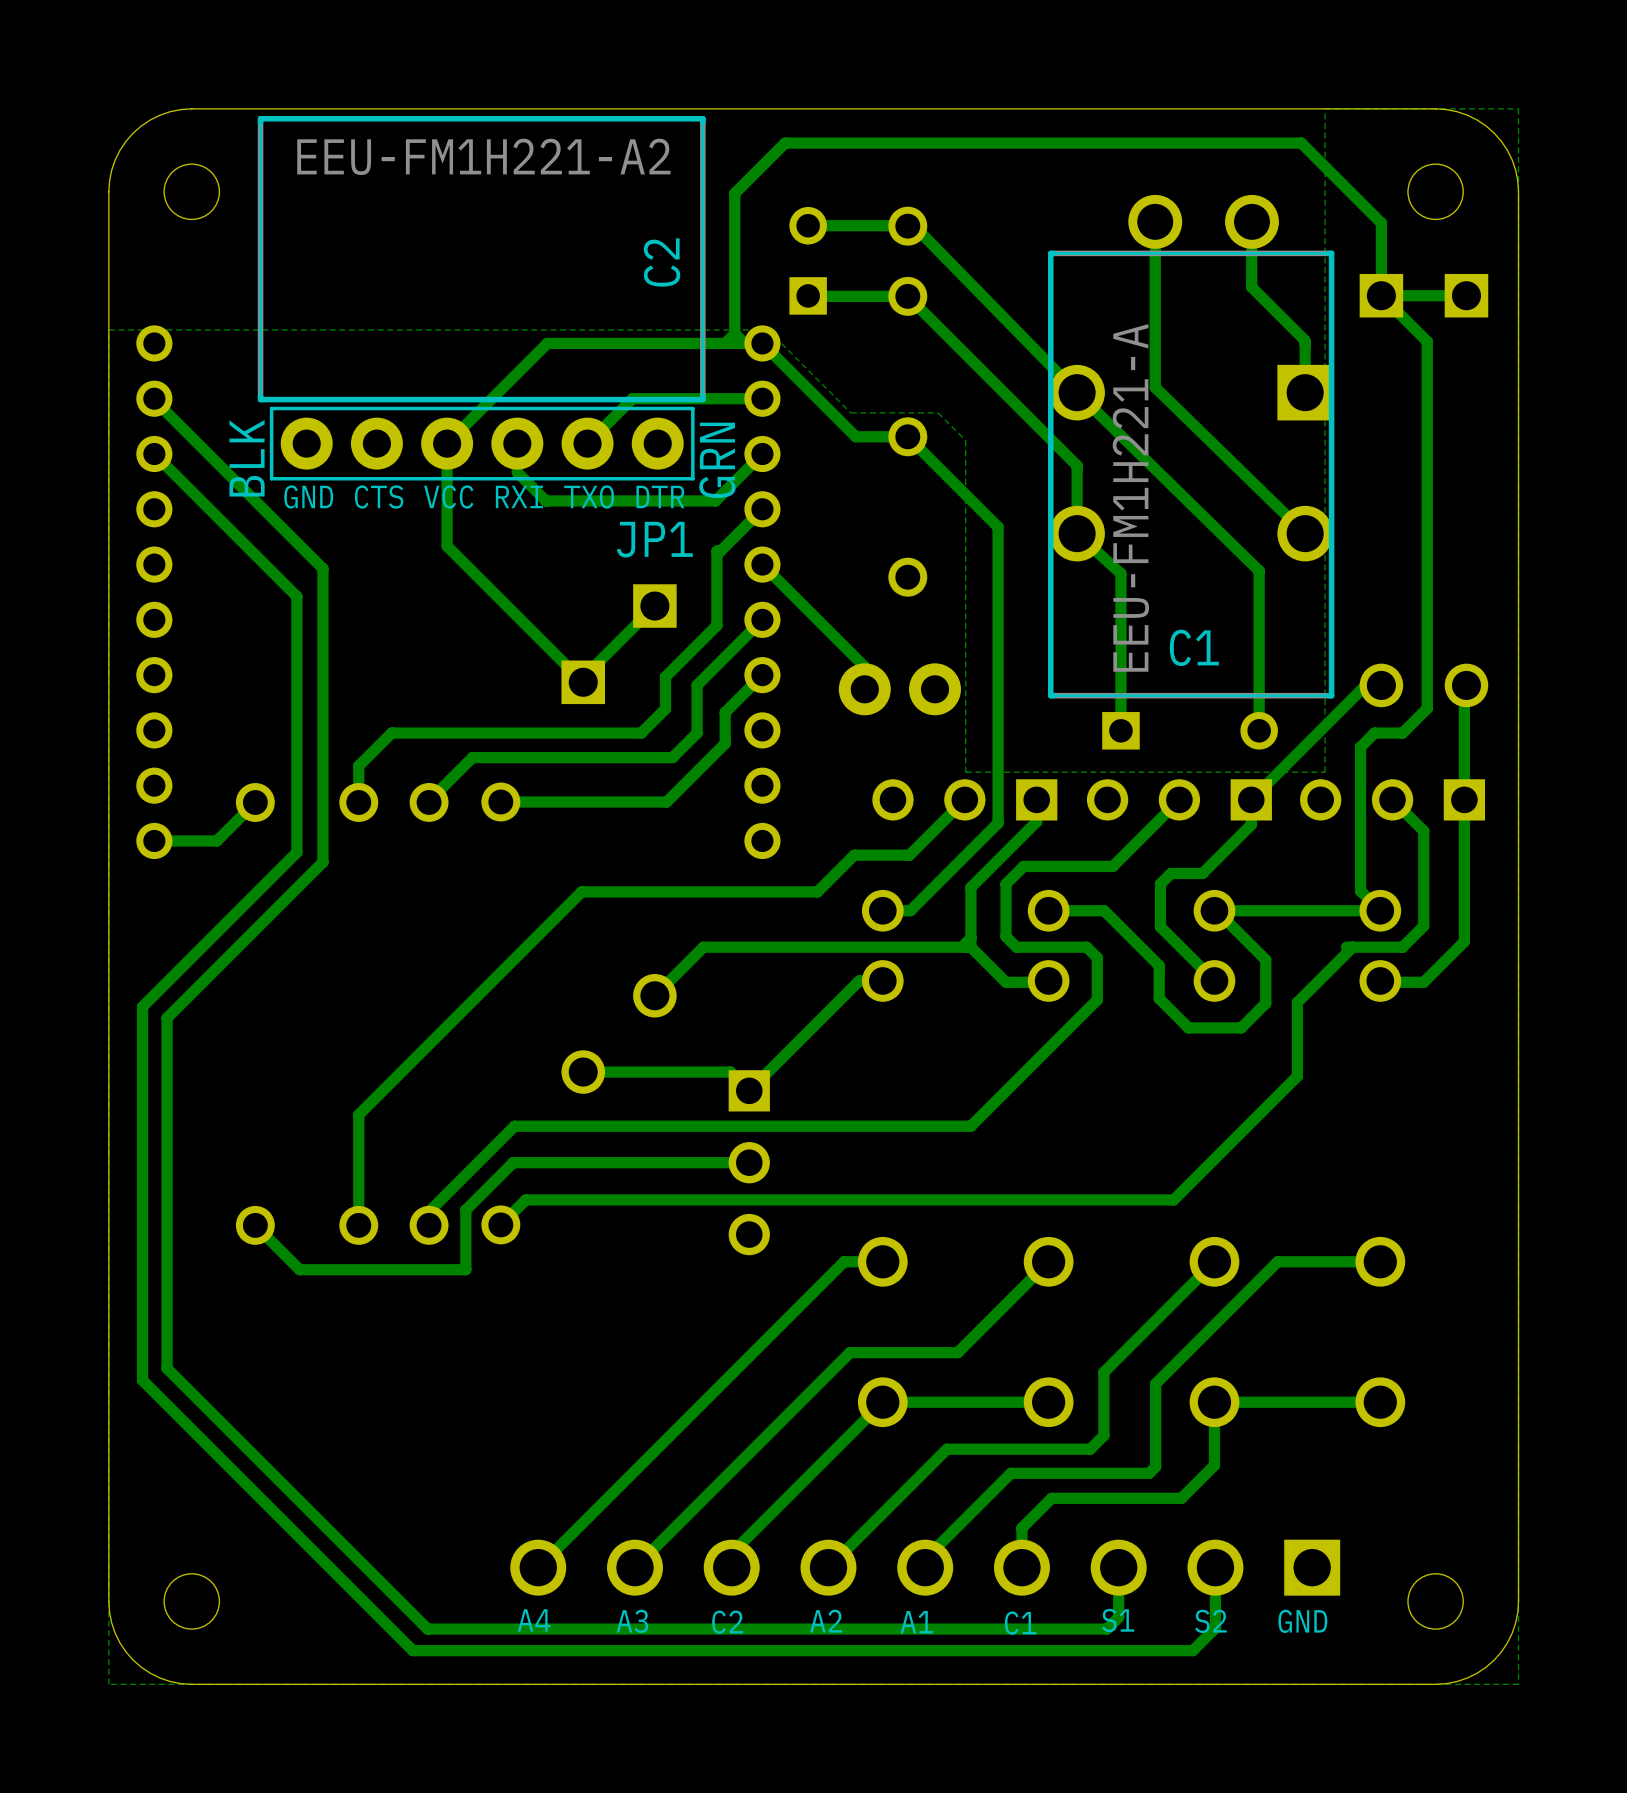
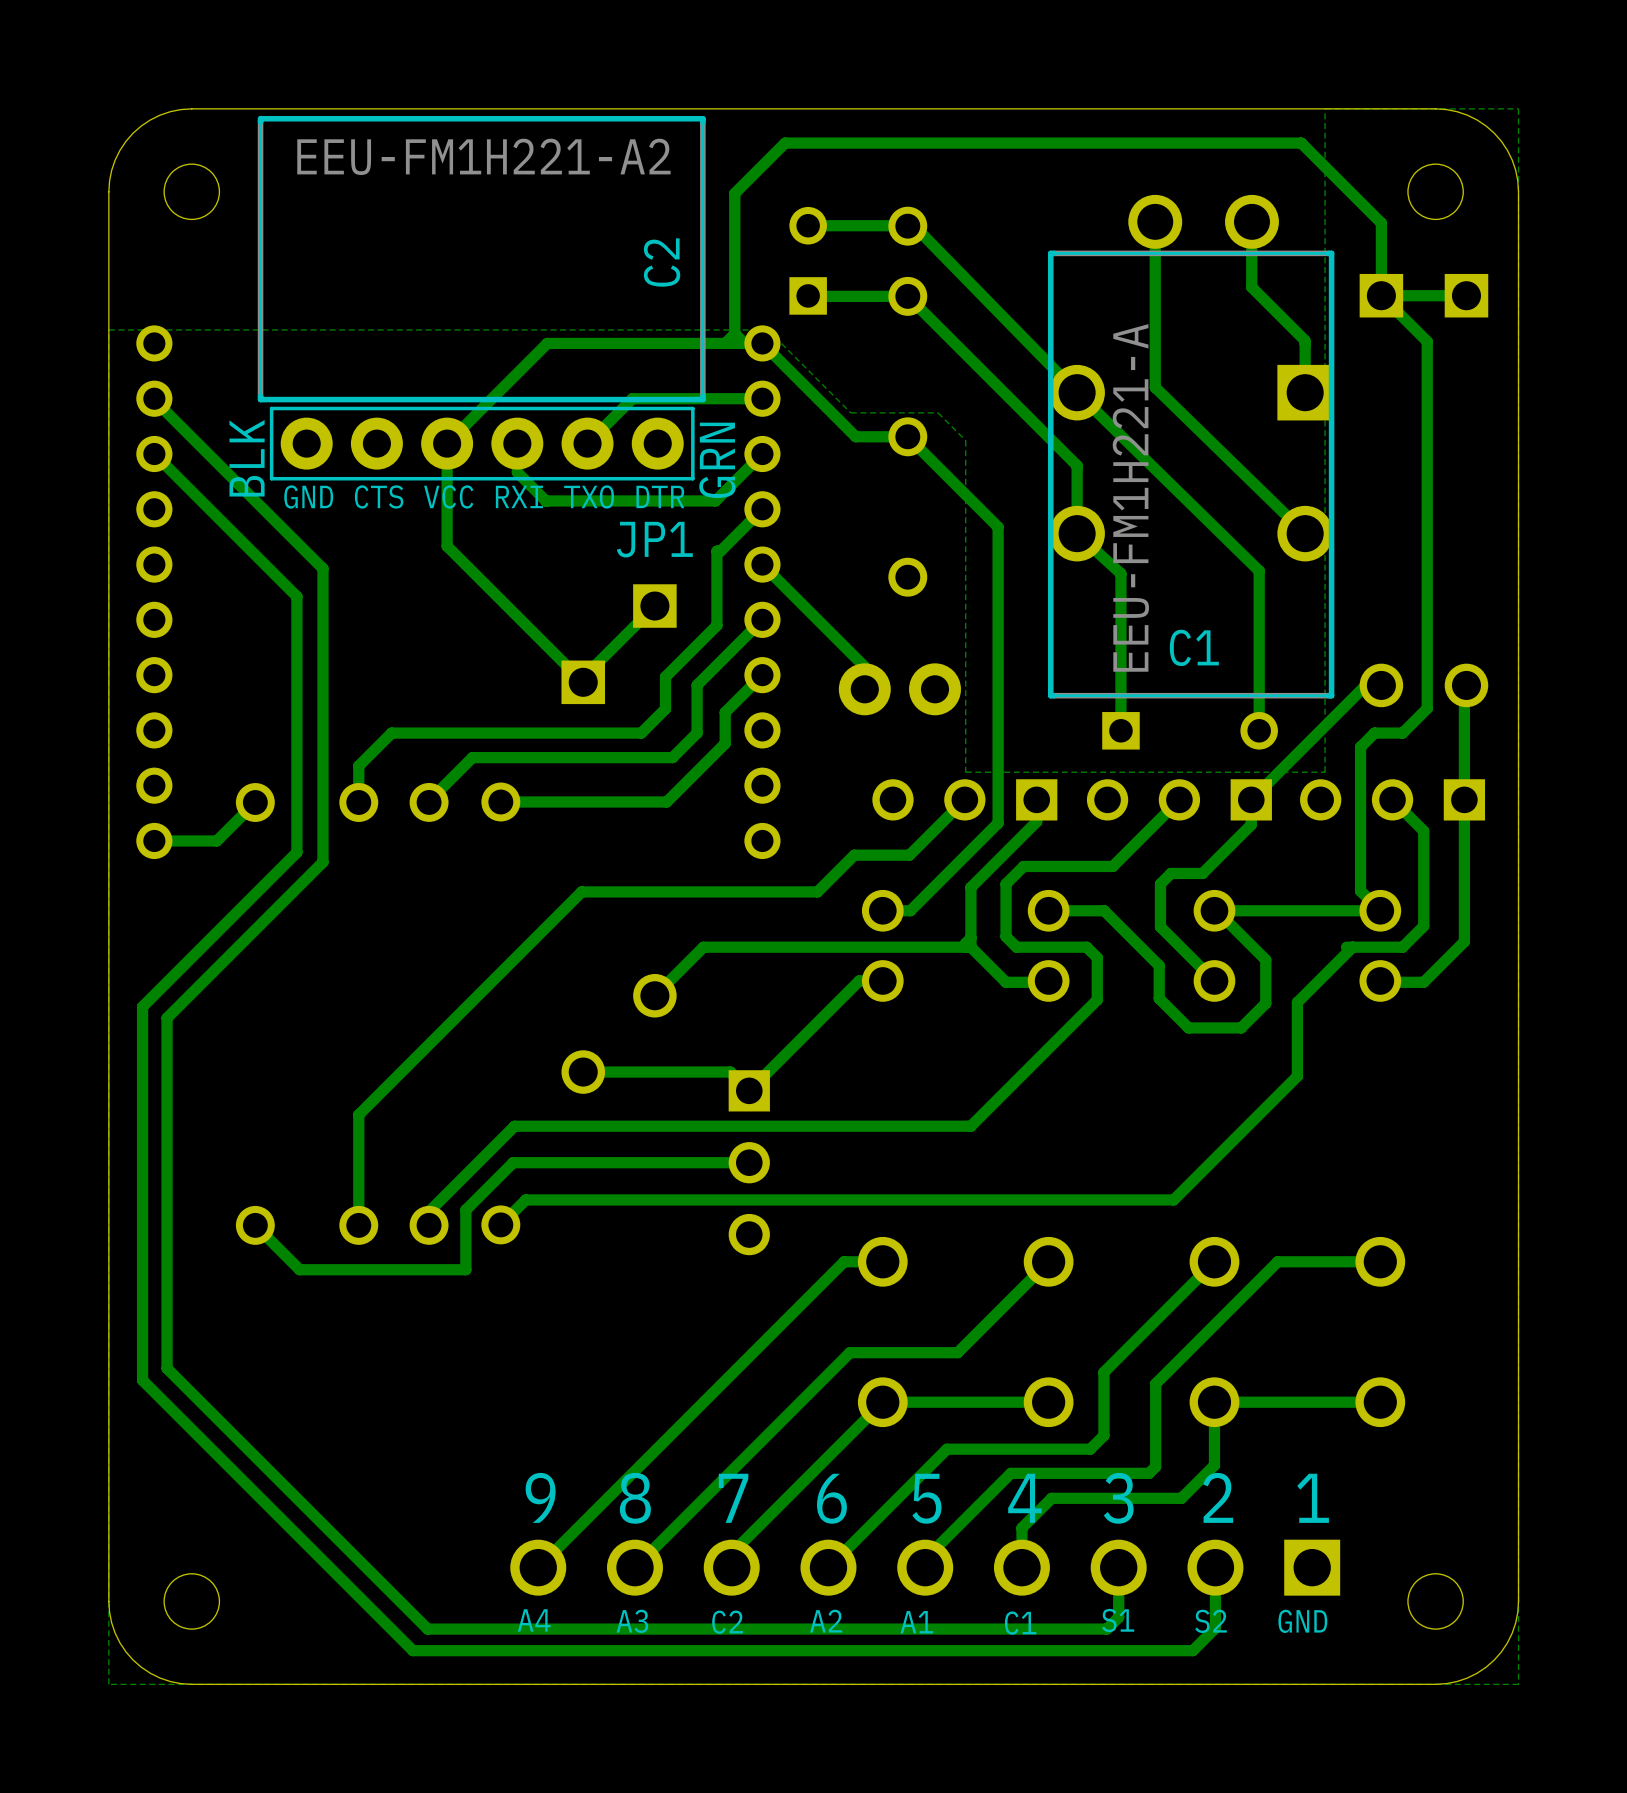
text: none -> 9 (540, 1497)
text: none -> 2 (1218, 1497)
text: none -> 8 (635, 1498)
text: none -> 7 (733, 1498)
text: none -> 6 (831, 1498)
text: none -> 5 (926, 1498)
text: none -> 4 (1024, 1498)
text: none -> 3 (1118, 1498)
text: none -> 1 (1313, 1498)

